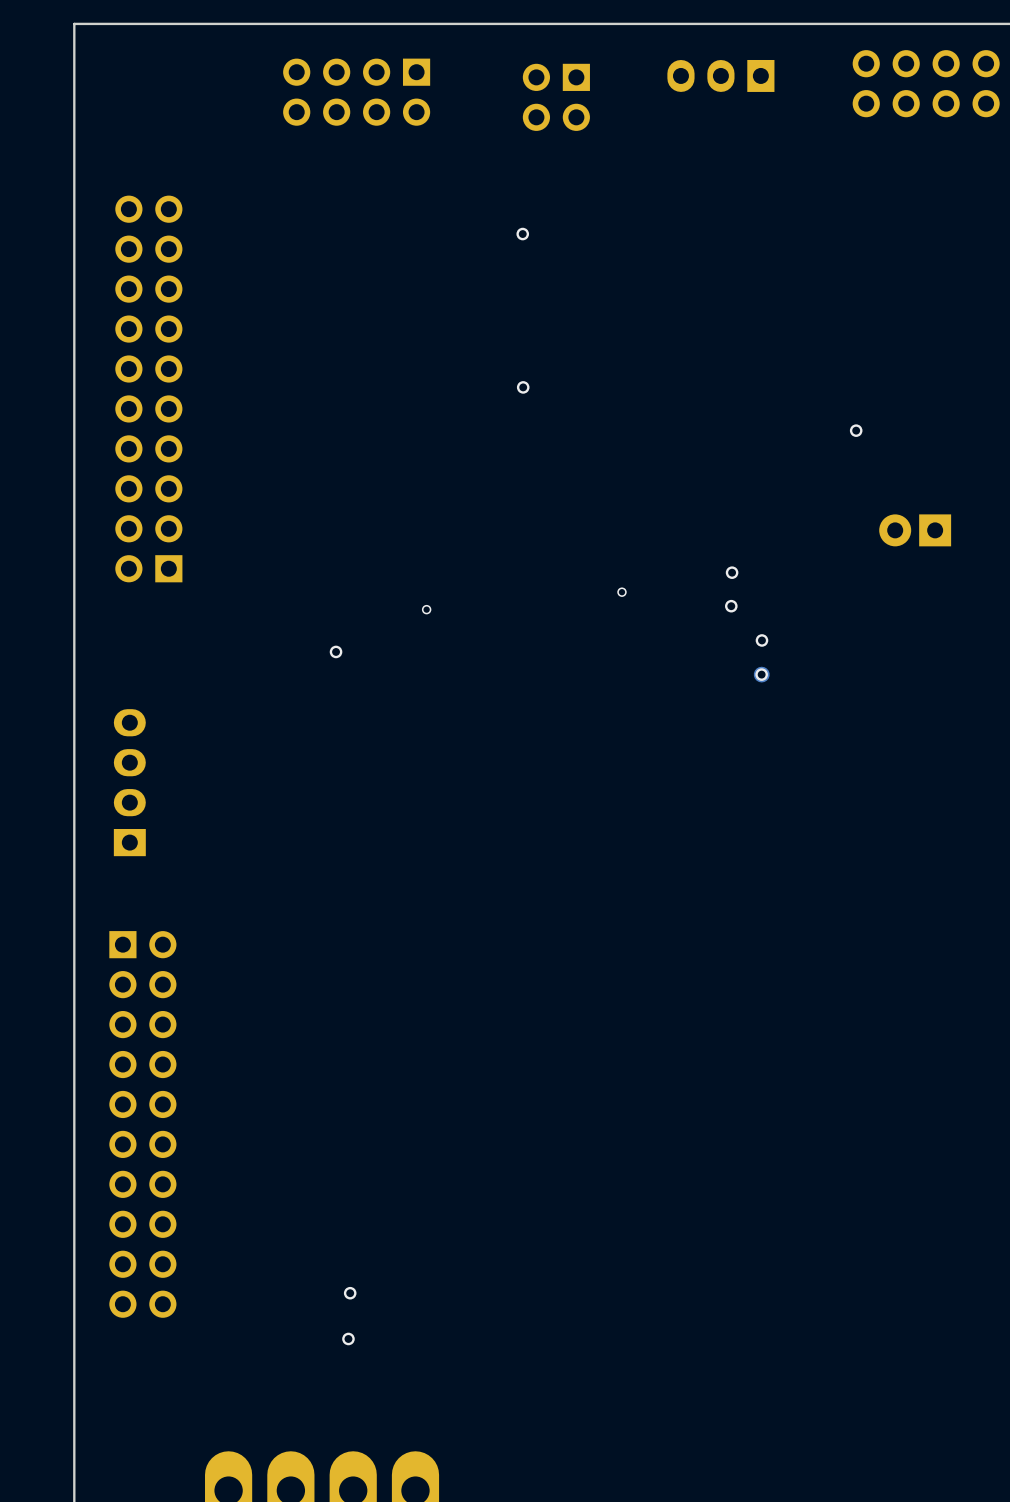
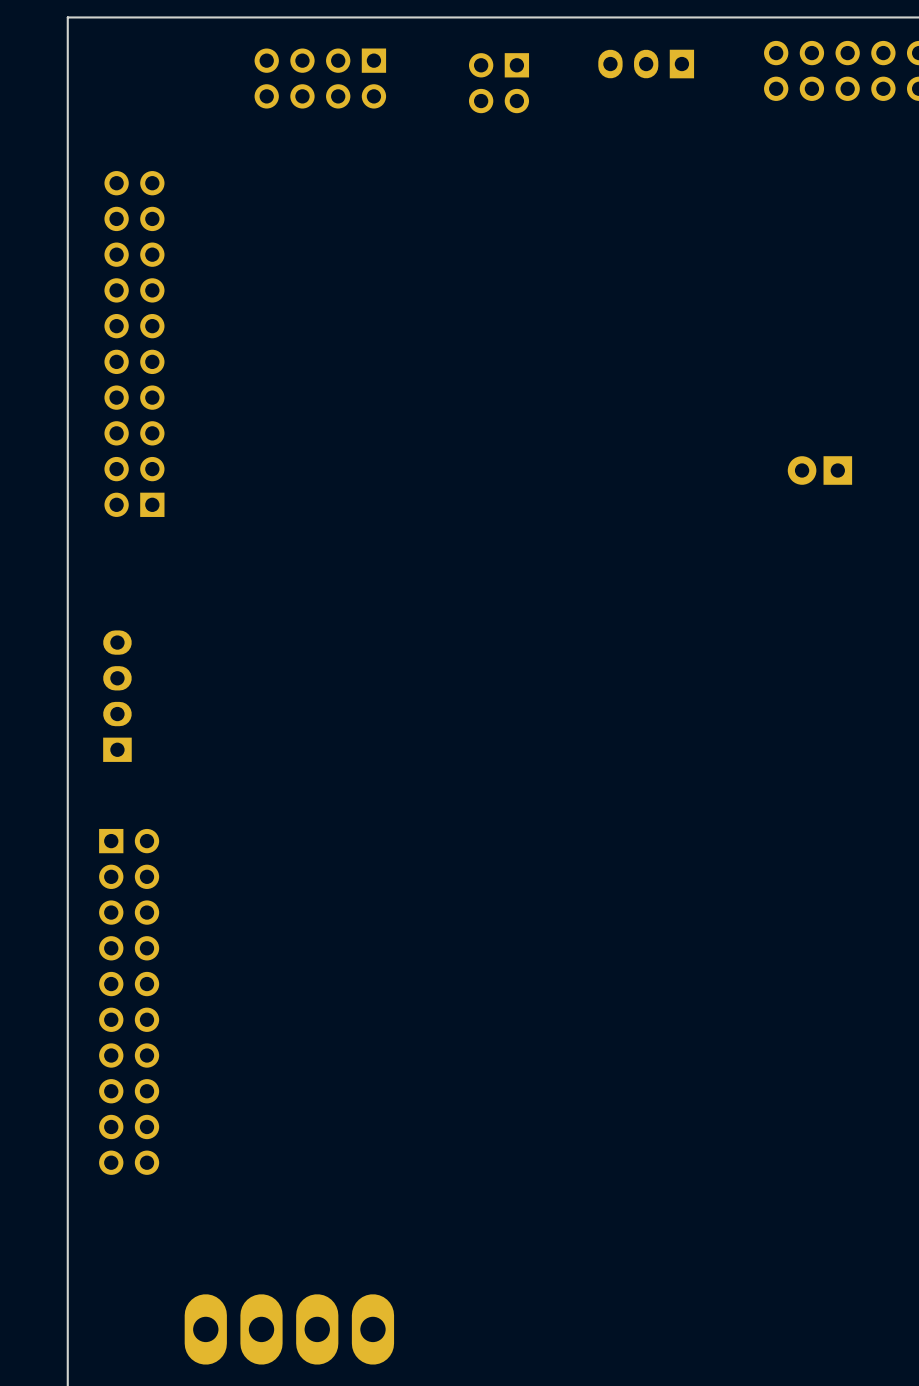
via: (522, 234) -> none
via: (523, 387) -> none
via: (856, 430) -> none
via: (732, 572) -> none
via: (621, 592) -> none
via: (731, 606) -> none
via: (426, 609) -> none
via: (761, 640) -> none
via: (336, 651) -> none
via: (761, 674) -> none
via: (350, 1293) -> none
via: (348, 1338) -> none

